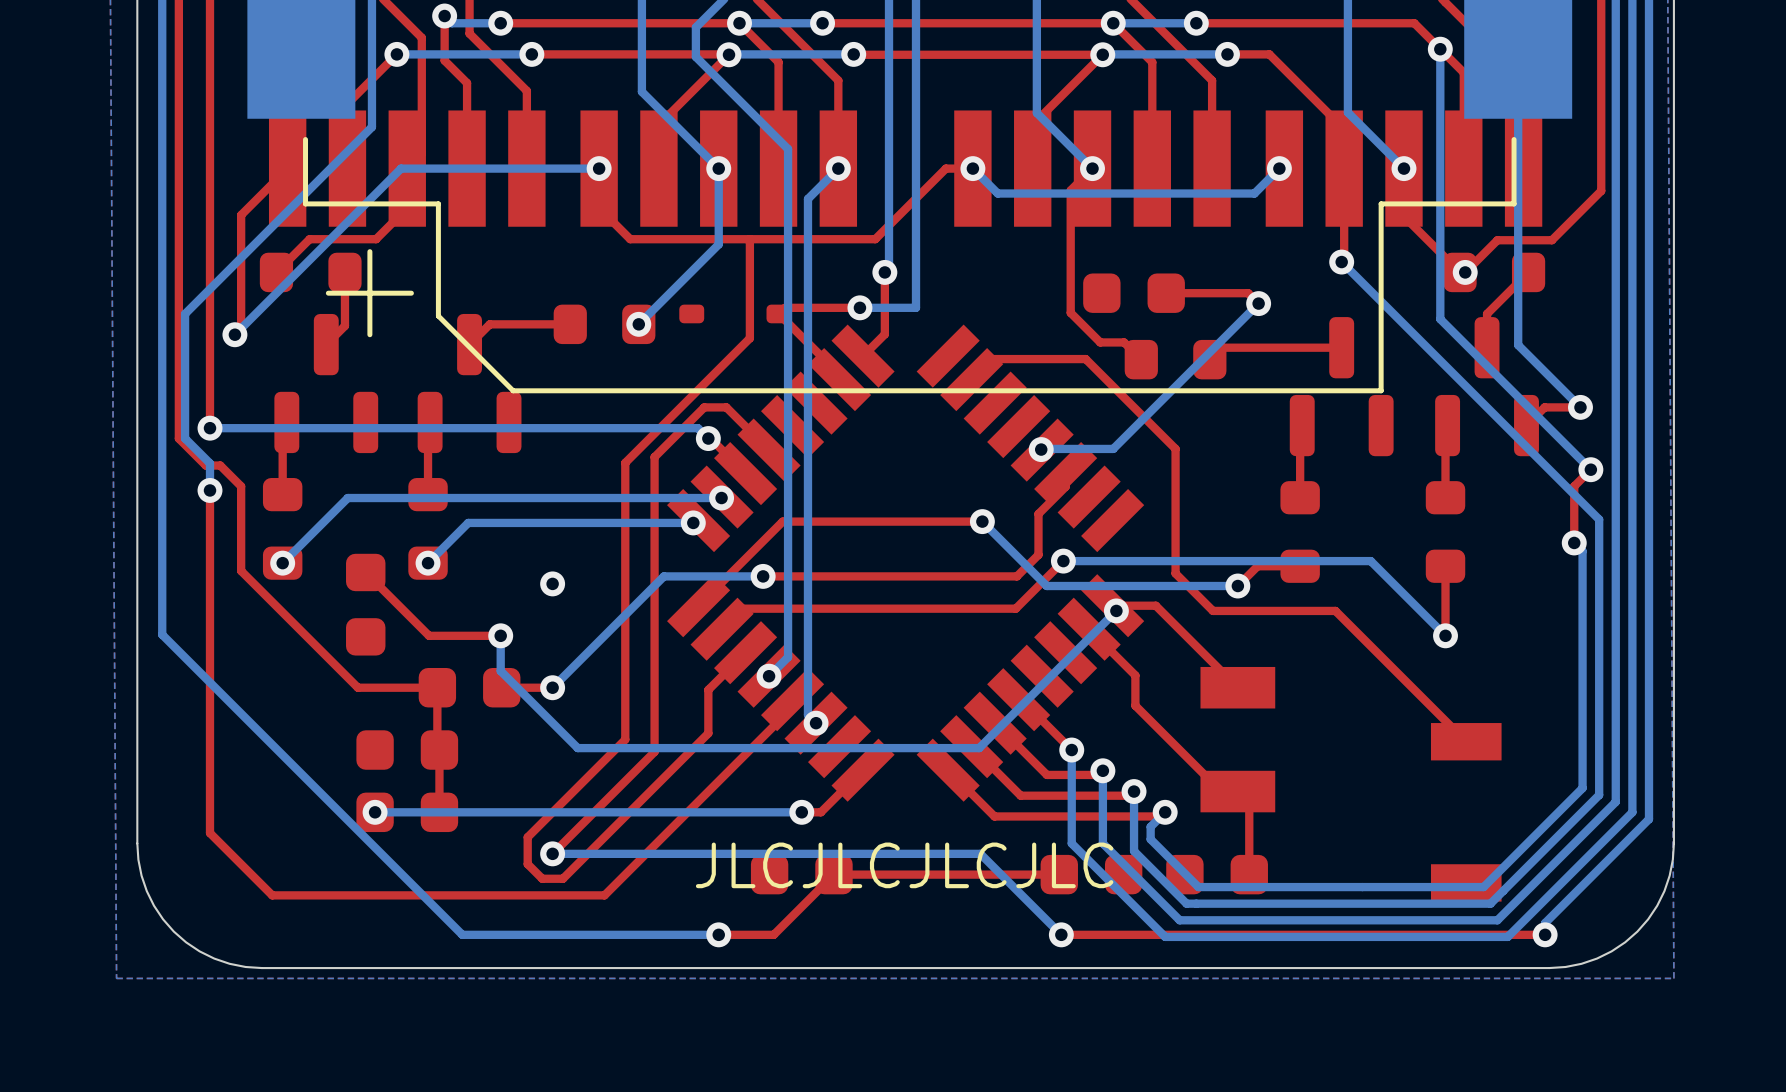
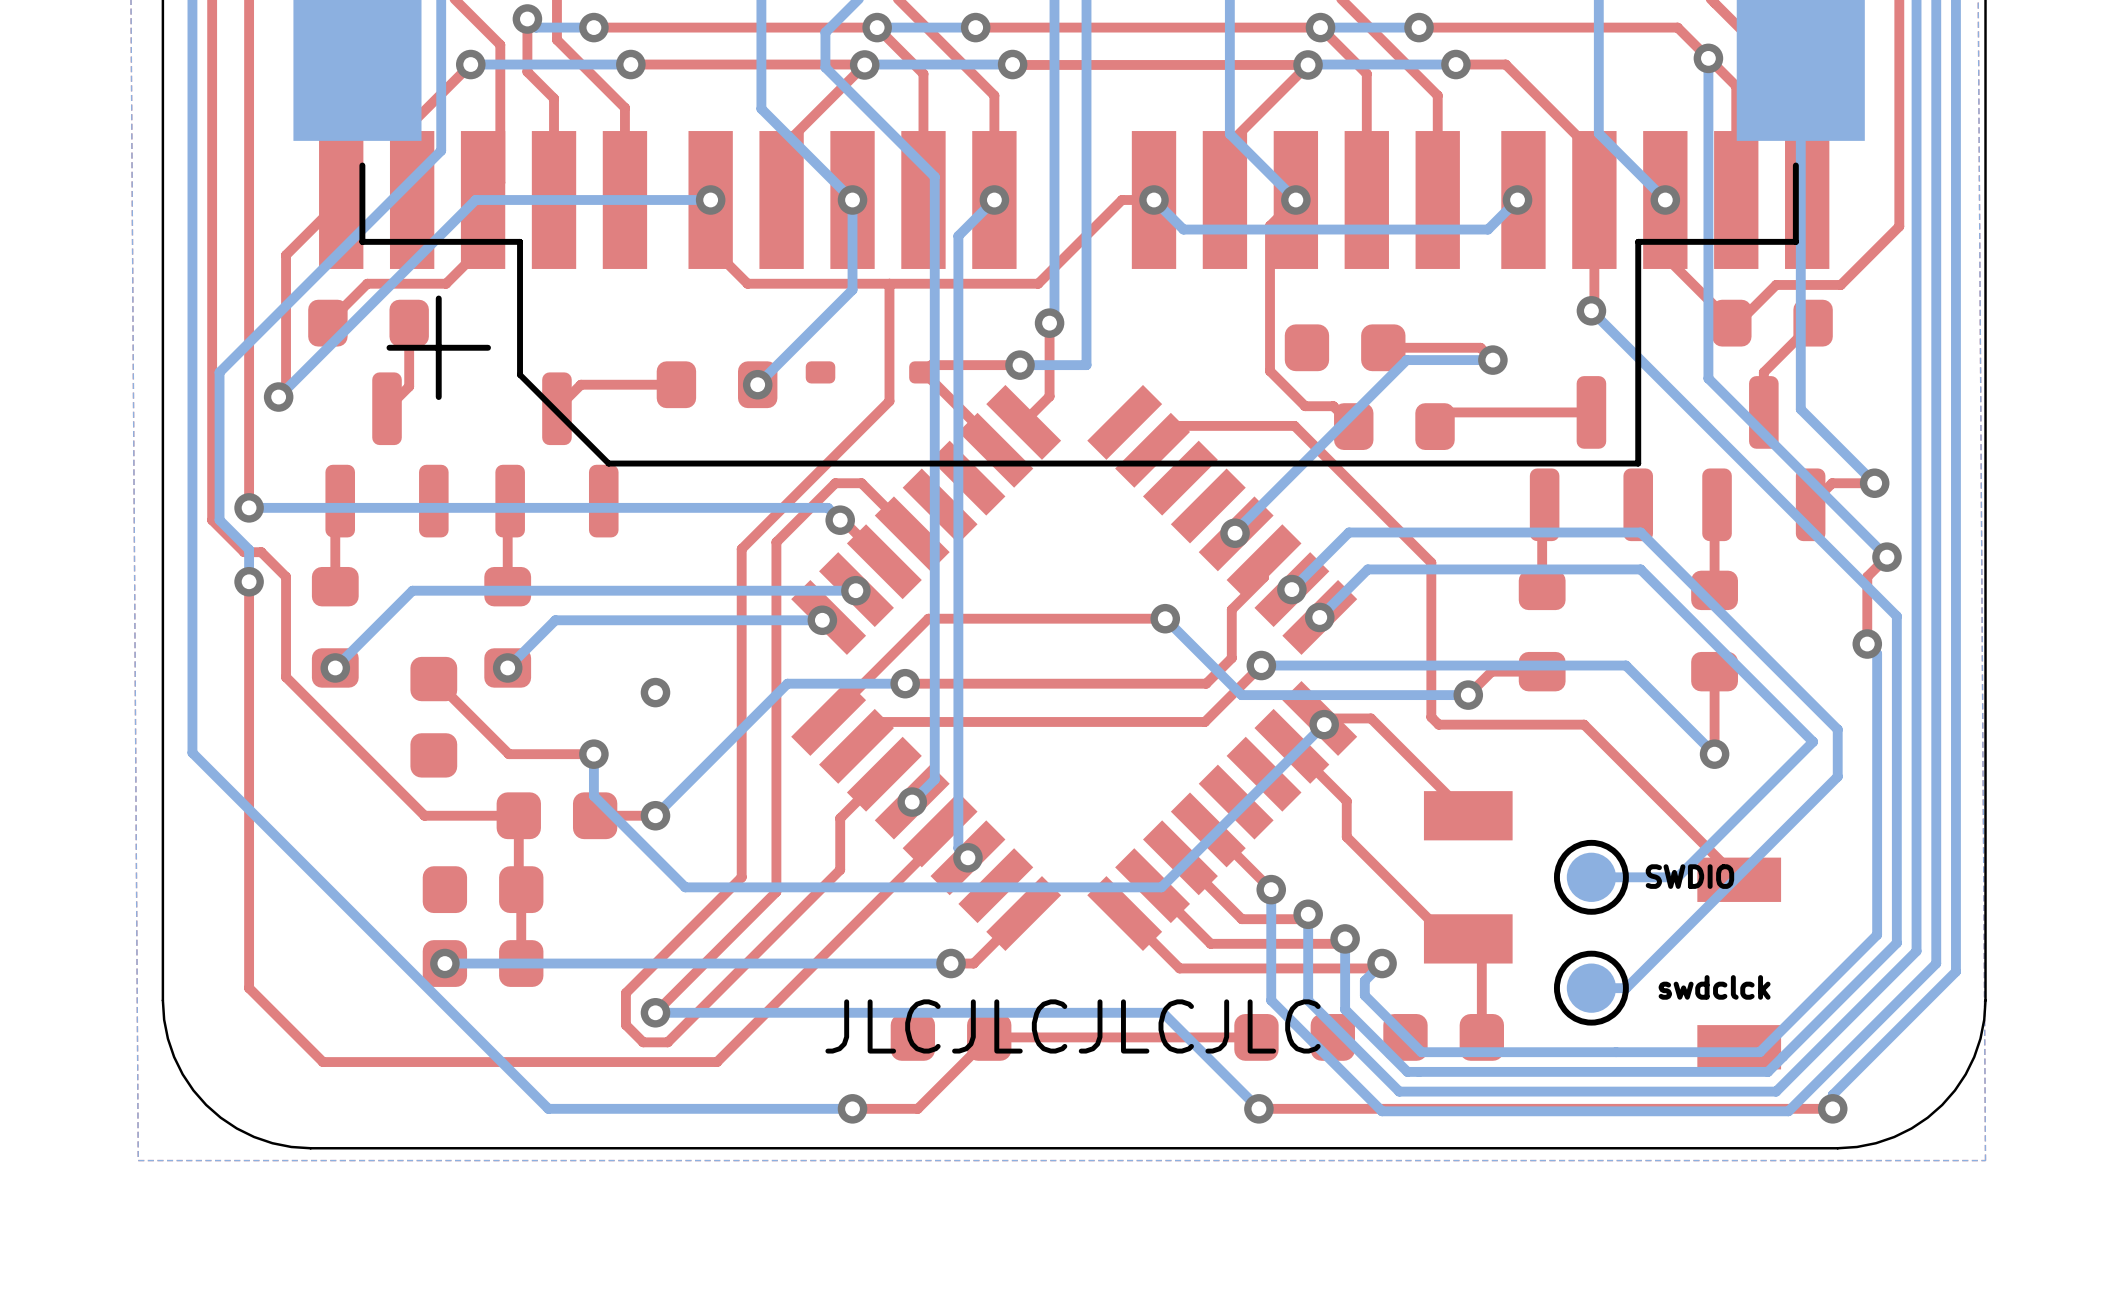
via: (1465, 272) -> none
bottom track: (1258, 303) (1113, 448) (1040, 448) -> (1492, 360) (1406, 360) (1234, 532)
top track: (1085, 359) (1175, 448) (1175, 573) (1206, 604) -> (1287, 425) (1294, 425) (1431, 562) (1431, 717)
bottom track: none -> (1291, 589) (1348, 532) (1640, 532) (1837, 729) (1837, 776) (1626, 988) (1591, 988)
via: none -> (1291, 589)
bottom track: none -> (1319, 617) (1367, 569) (1640, 569) (1813, 741) (1677, 877) (1591, 877)
via: none -> (1319, 617)
SWDIO: none -> (1591, 877)
swdclck: none -> (1591, 988)

